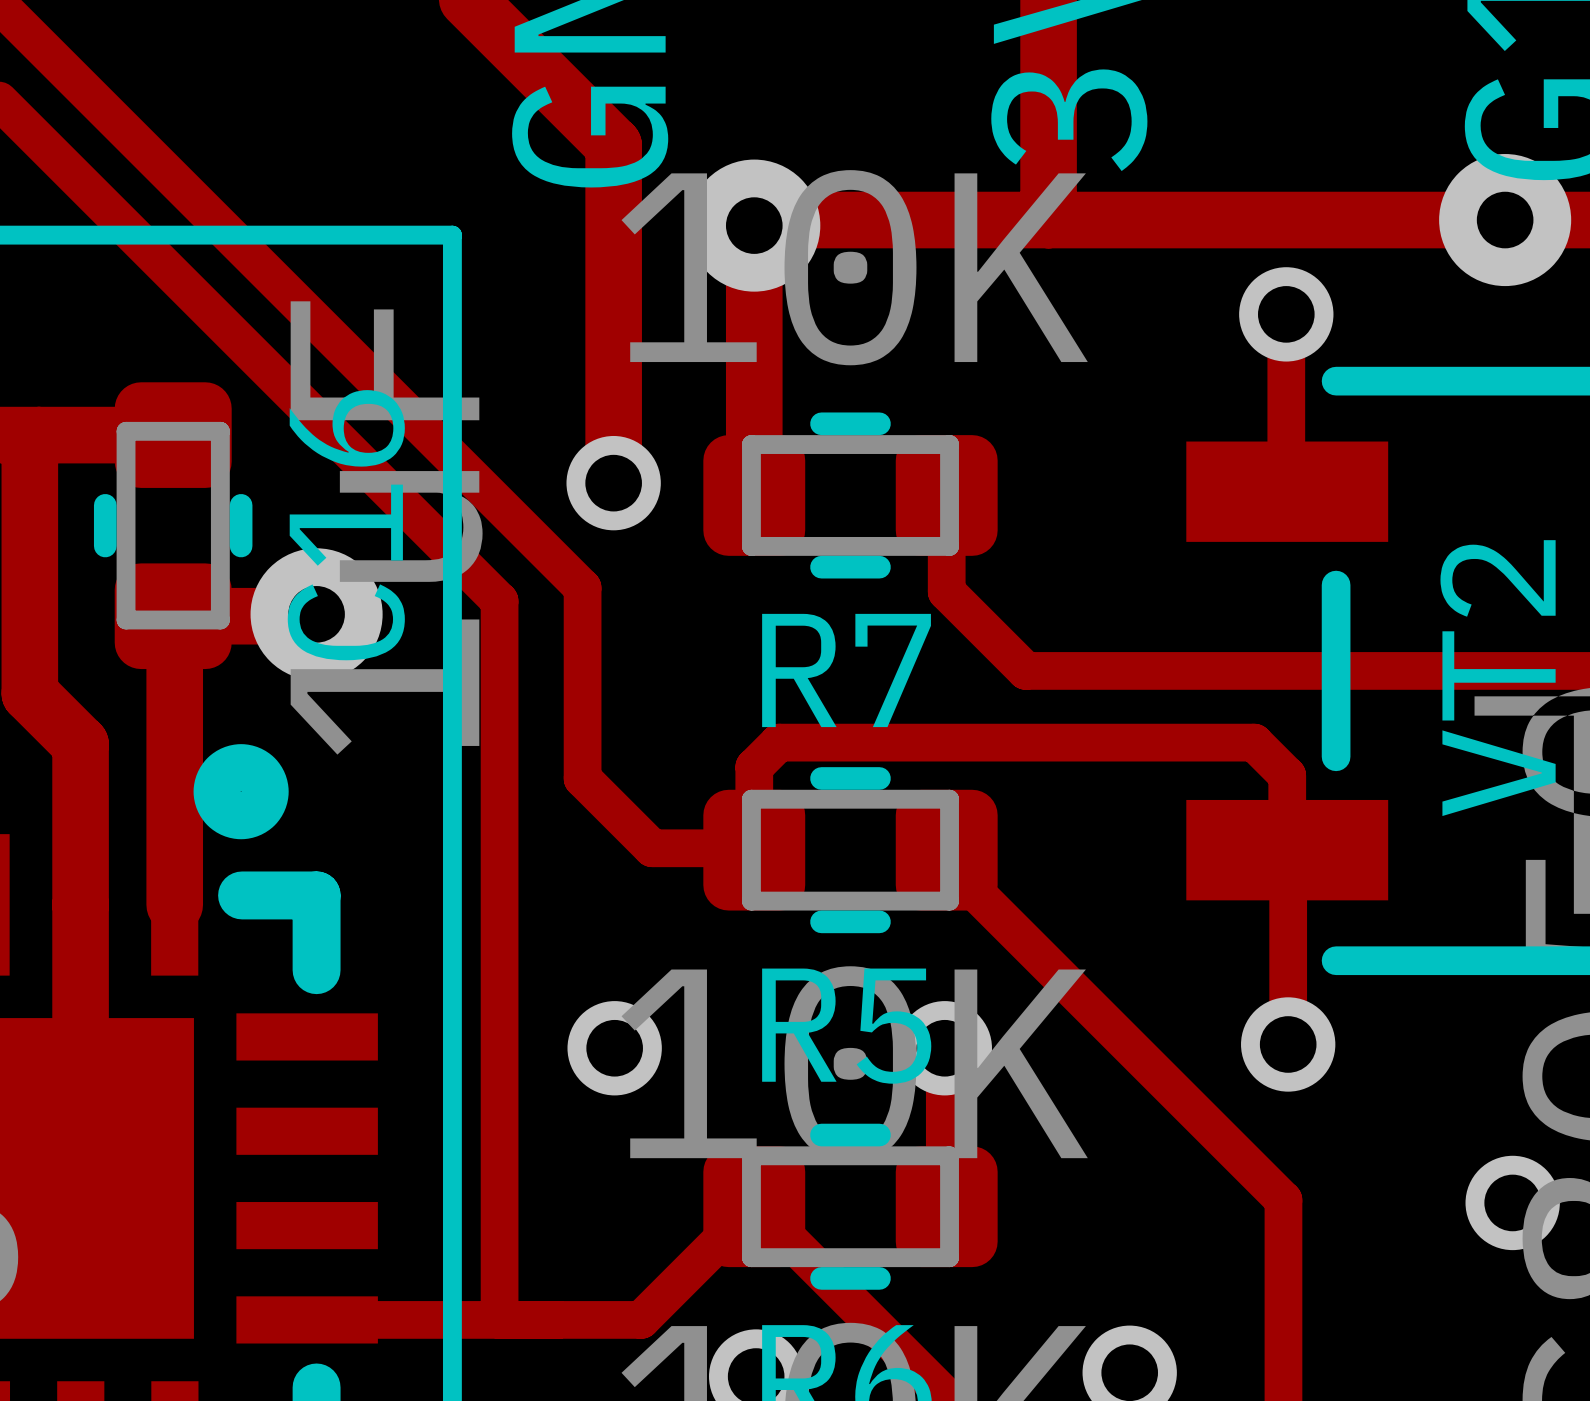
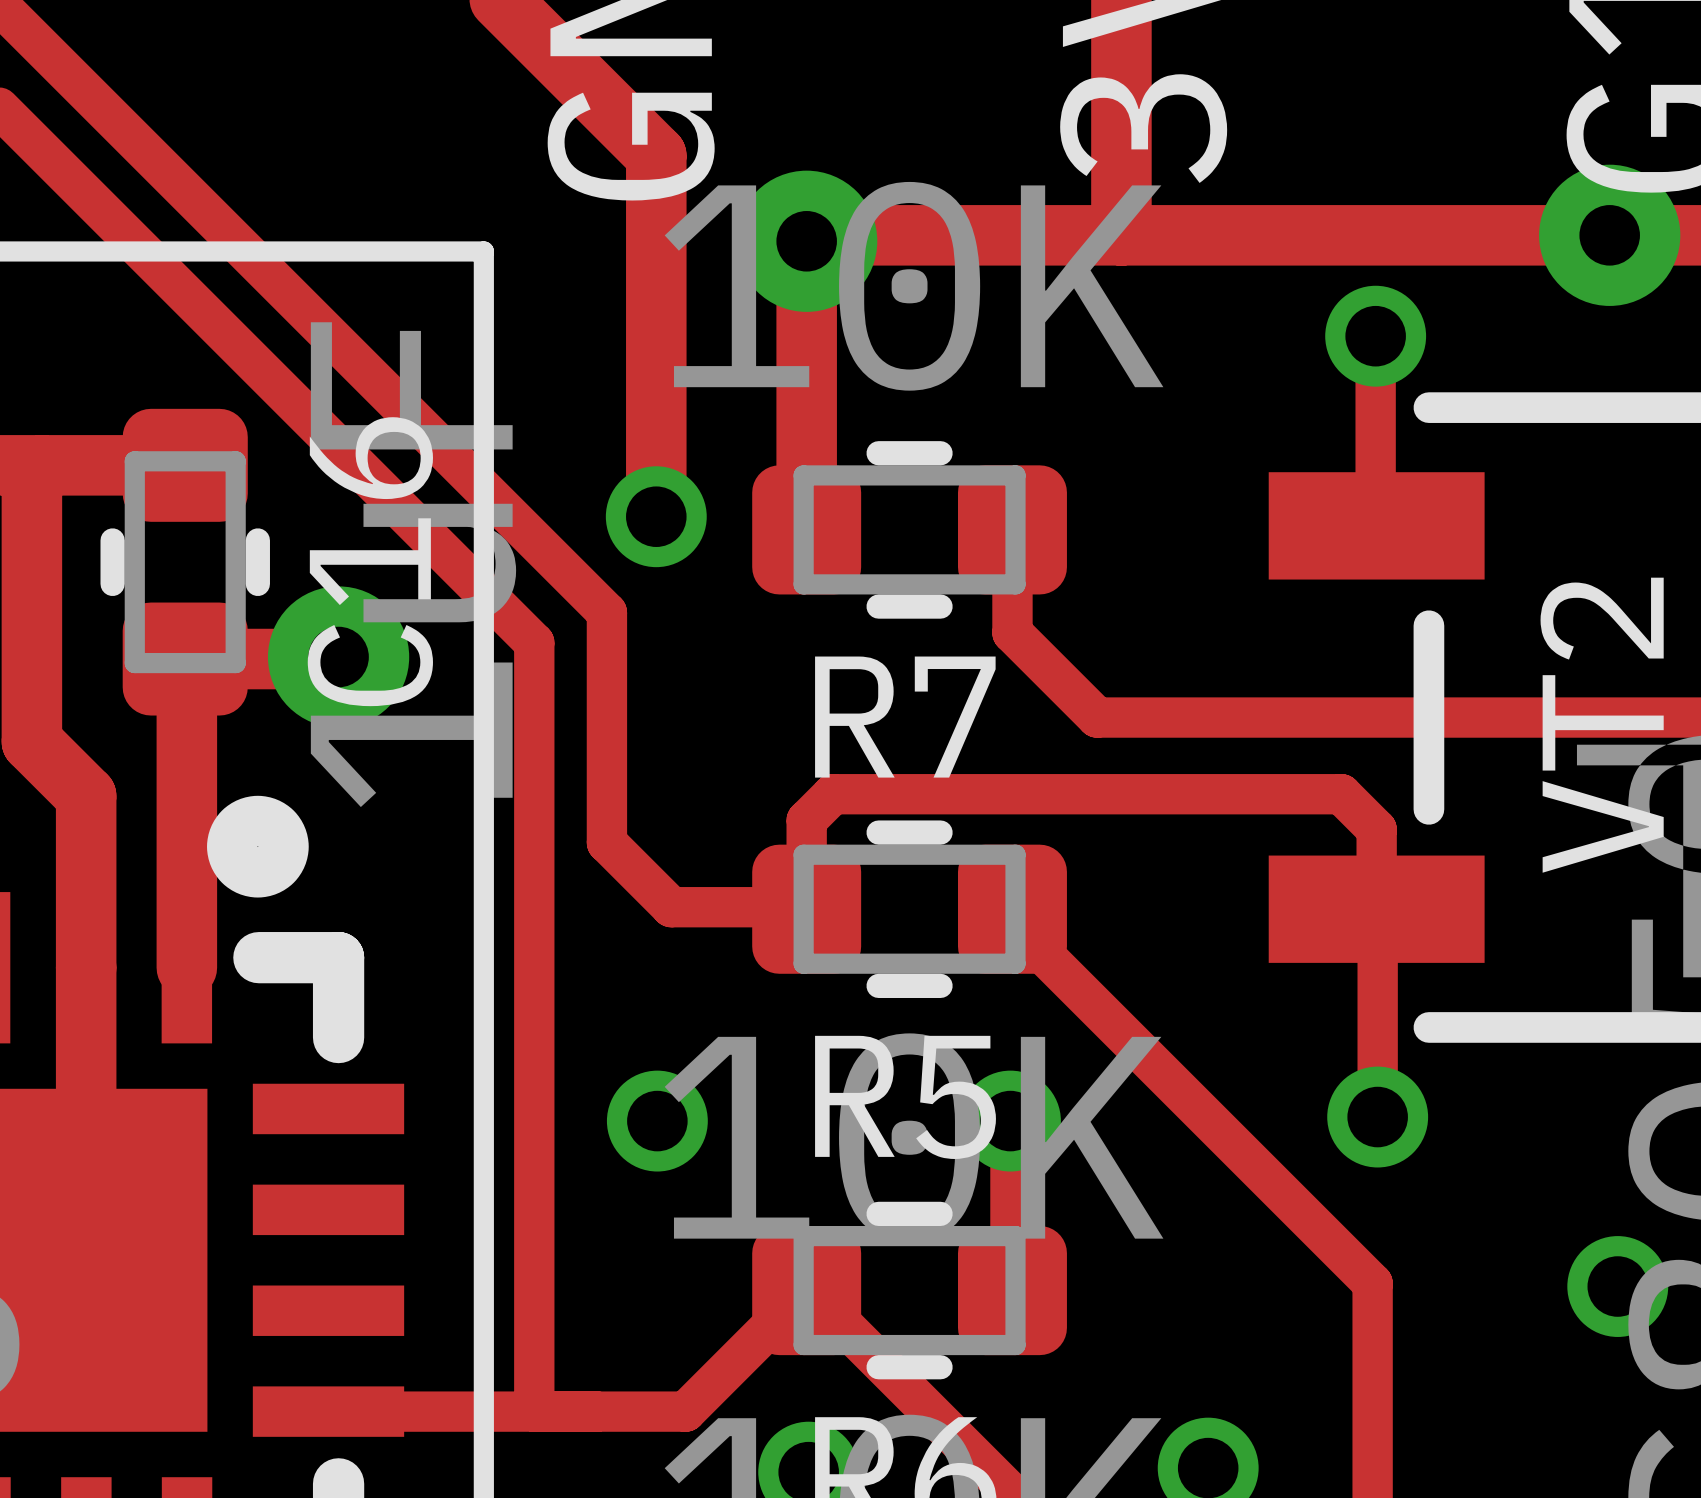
track: (567, 572) (582, 587) (582, 778) (652, 848) -> (606, 612) (606, 842) (671, 907) (697, 907)

